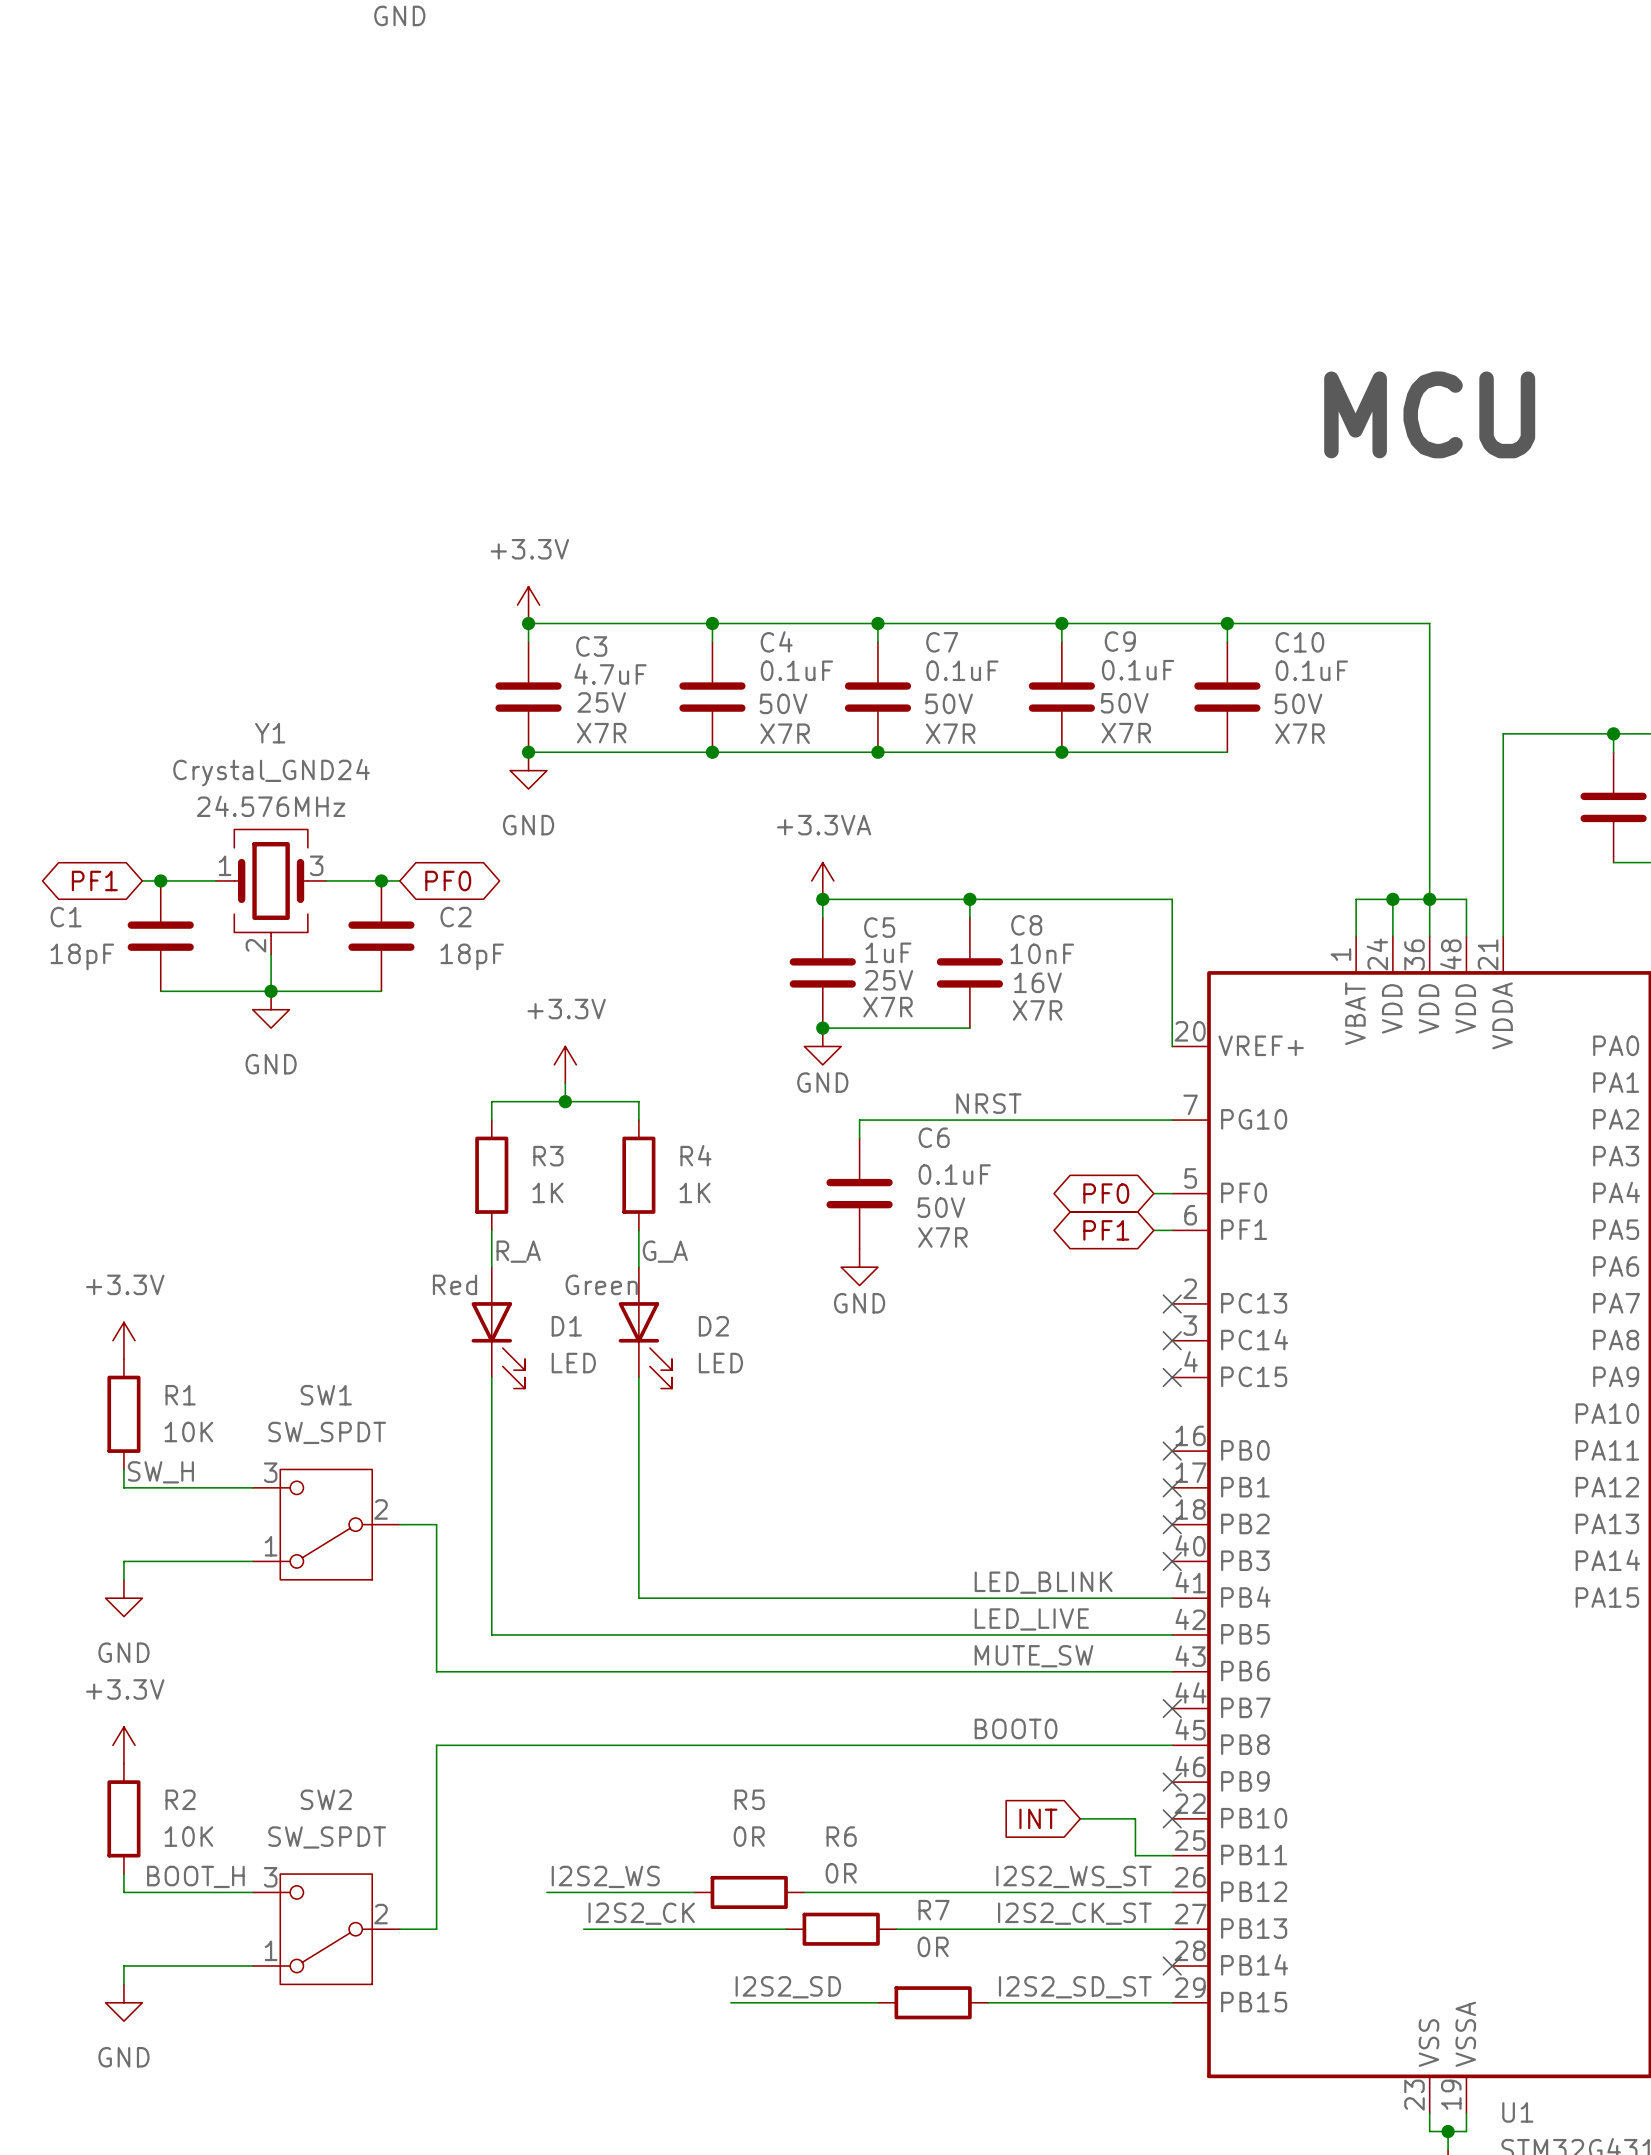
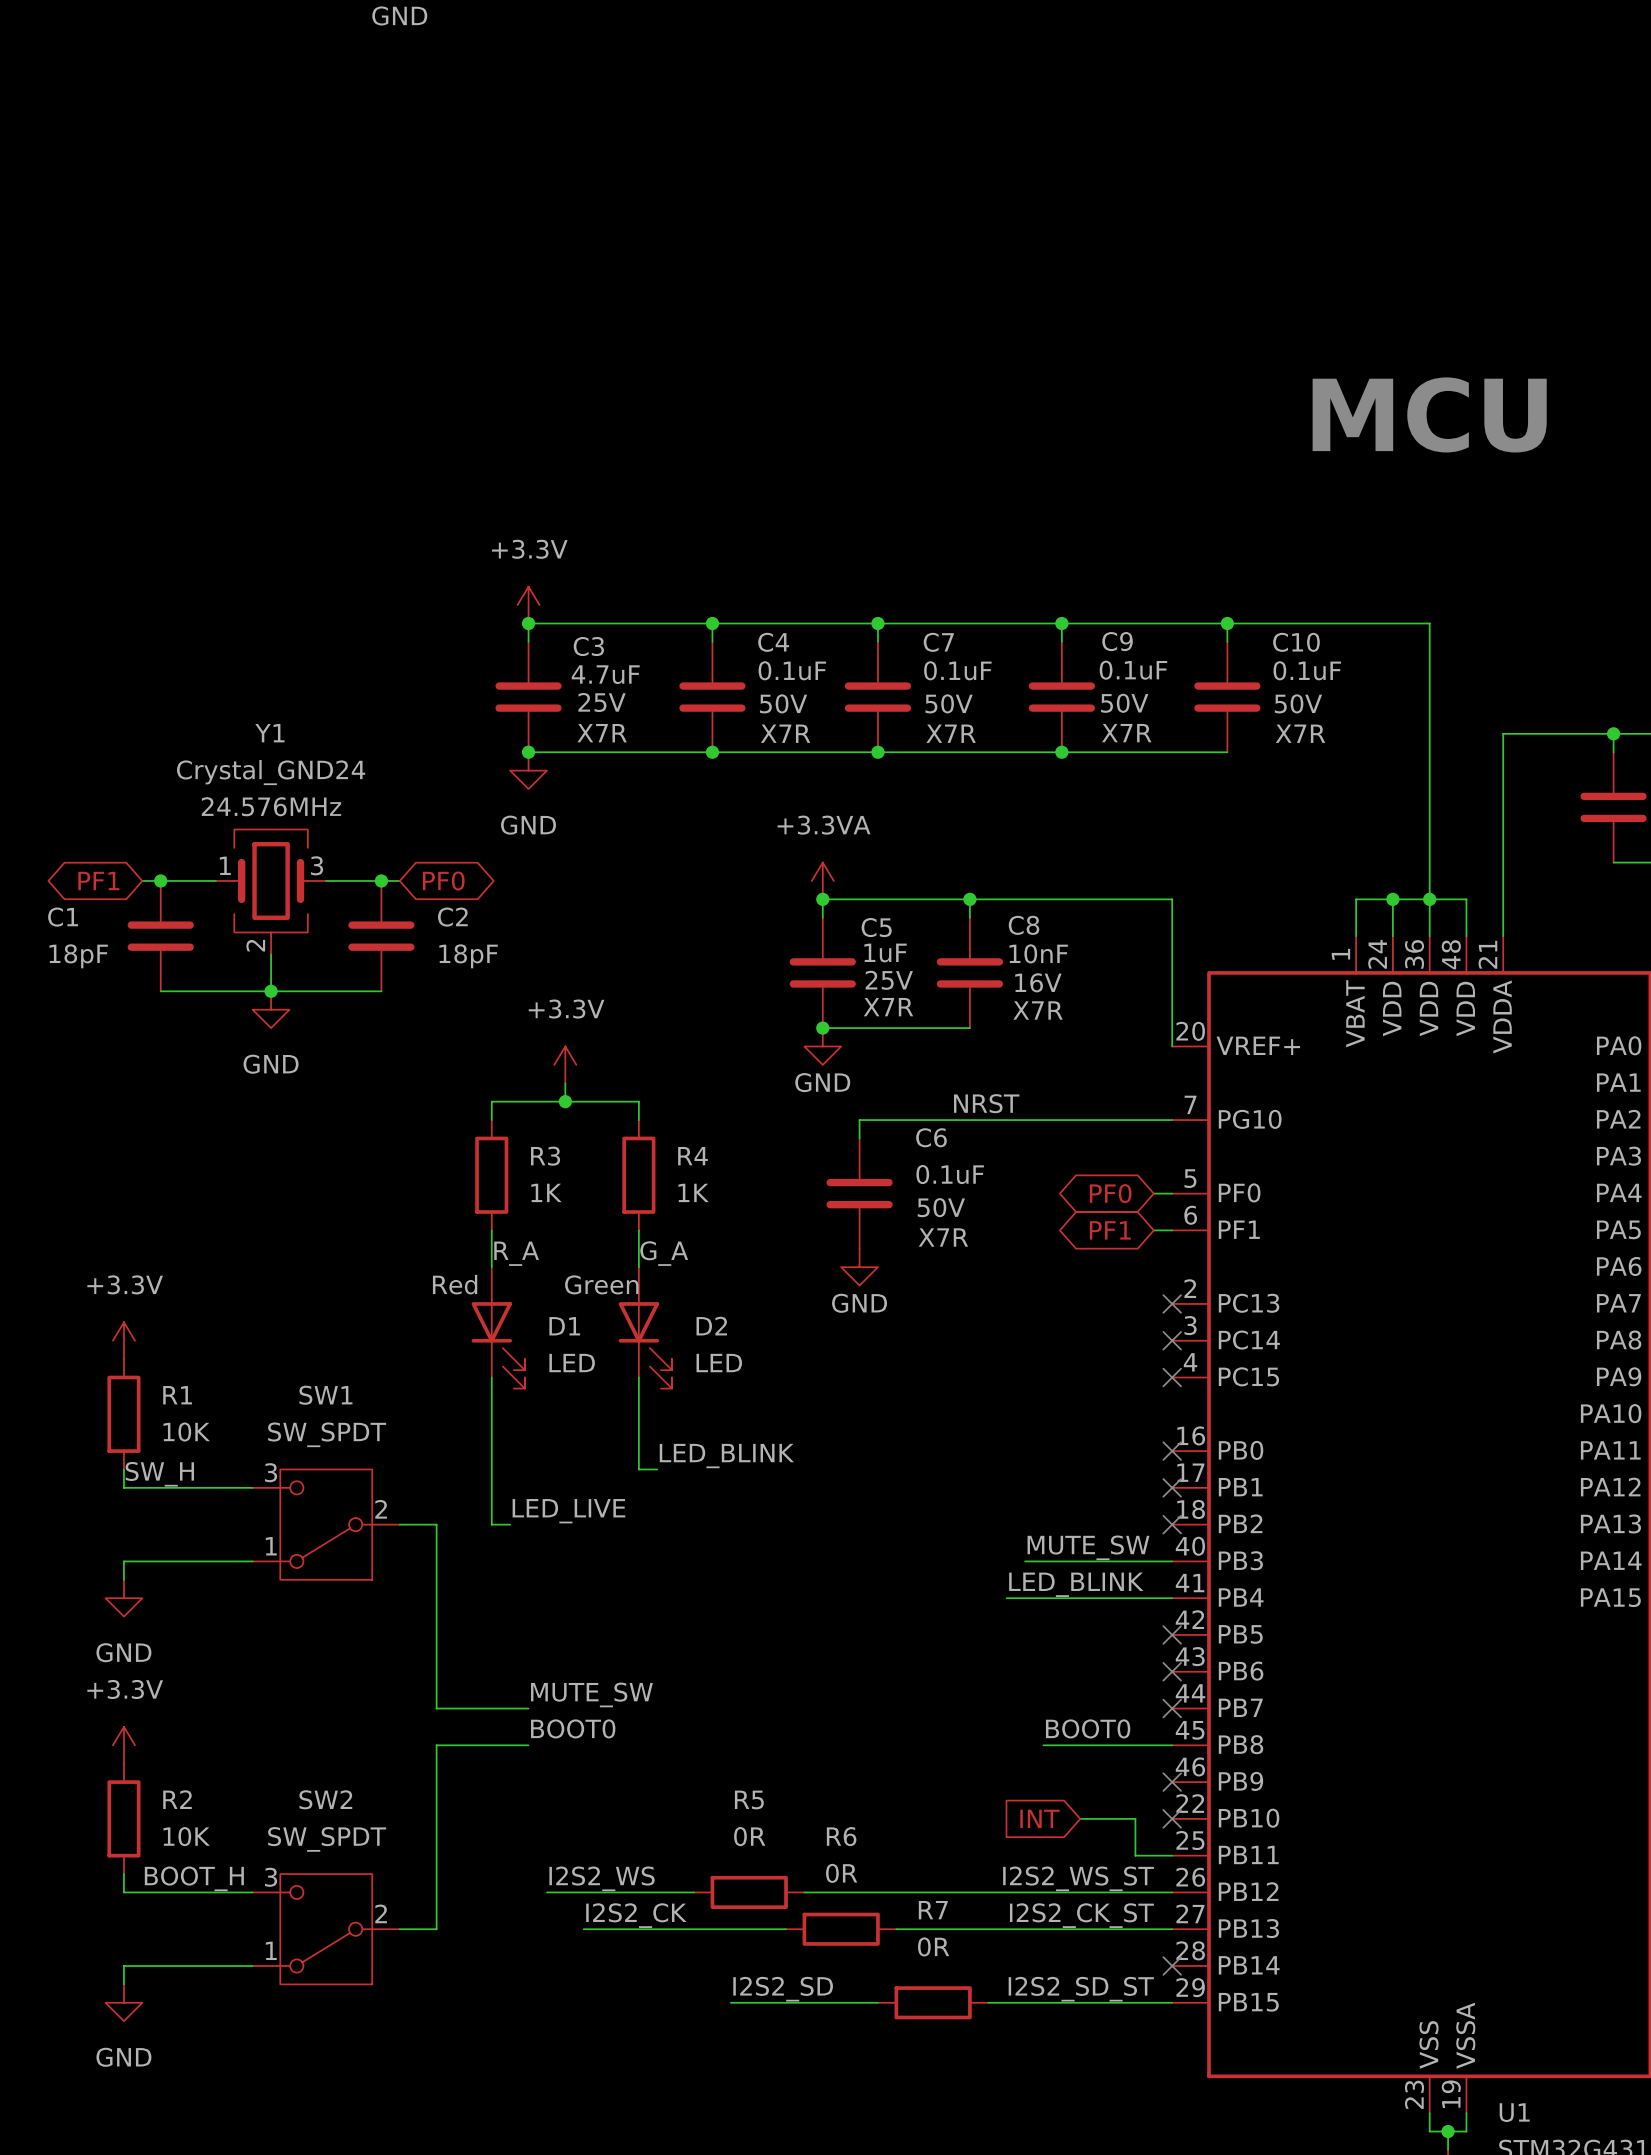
label: none -> LED_BLINK (726, 1456)
wire: (638, 1469) (638, 1598) (1006, 1598) -> (638, 1469) (657, 1469)
label: none -> LED_LIVE (568, 1511)
wire: (491, 1524) (491, 1634) (1172, 1634) -> (491, 1524) (510, 1524)
wire: none -> (1025, 1561) (1172, 1561)
no-connect mark: (1172, 1561) -> none
label position: LED_BLINK (1043, 1582) -> LED_BLINK (1076, 1584)
label: LED_LIVE (1031, 1619) -> none
no-connect mark: none -> (1172, 1634)
label position: MUTE_SW (1033, 1656) -> MUTE_SW (1088, 1547)
wire: (436, 1671) (1172, 1671) -> (436, 1671) (436, 1708) (528, 1708)
no-connect mark: none -> (1172, 1671)
label: none -> MUTE_SW (591, 1694)
label: none -> BOOT0 (573, 1728)
label position: BOOT0 (1016, 1728) -> BOOT0 (1088, 1728)
wire: (528, 1745) (1043, 1745) -> none

